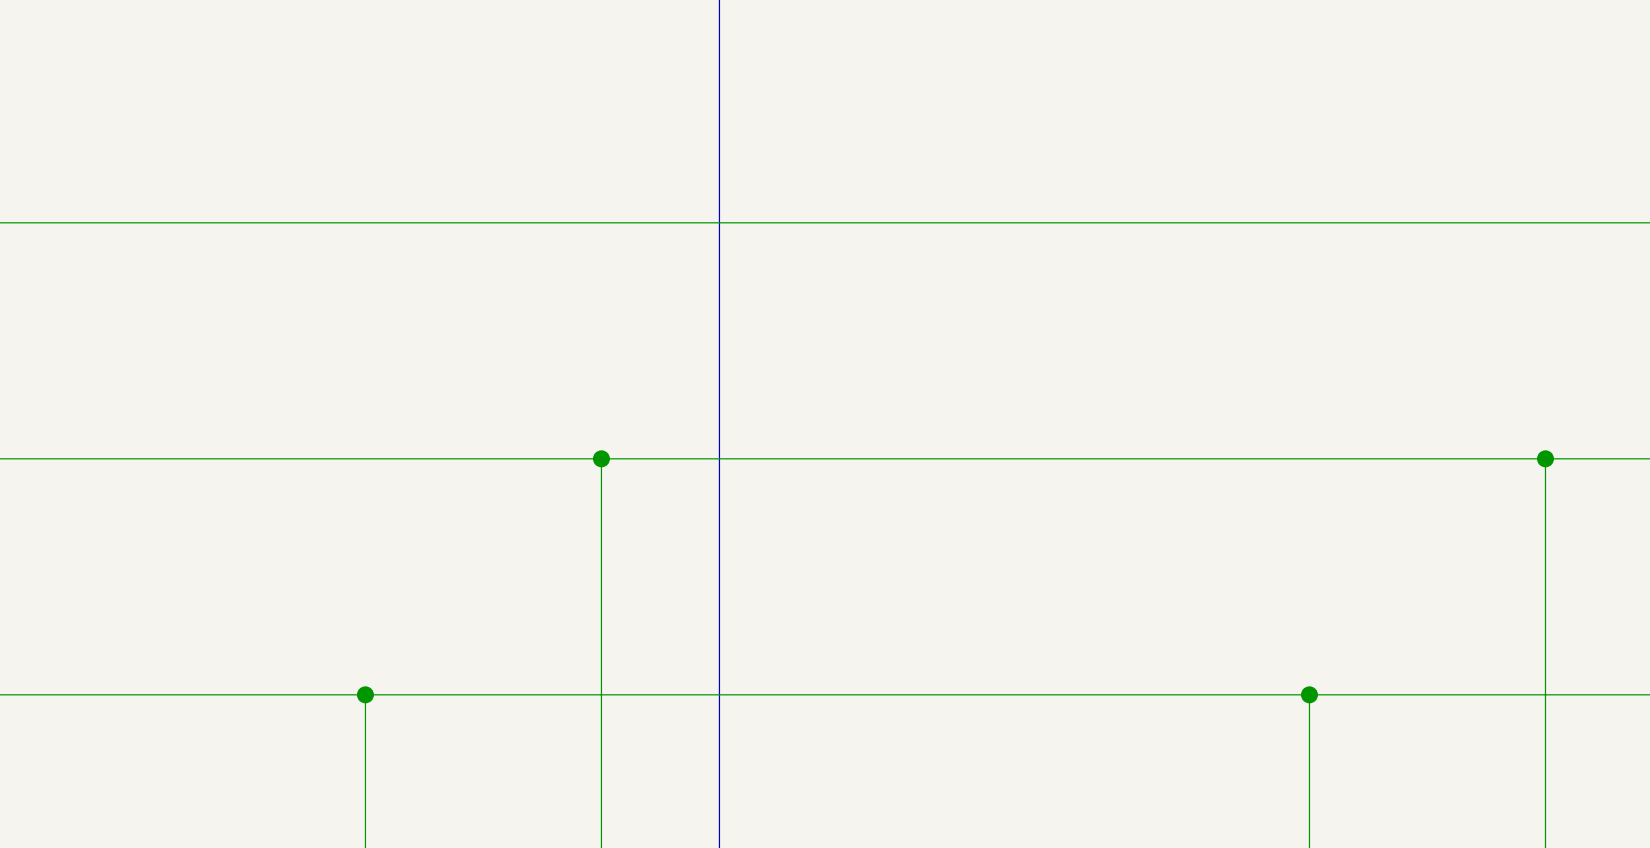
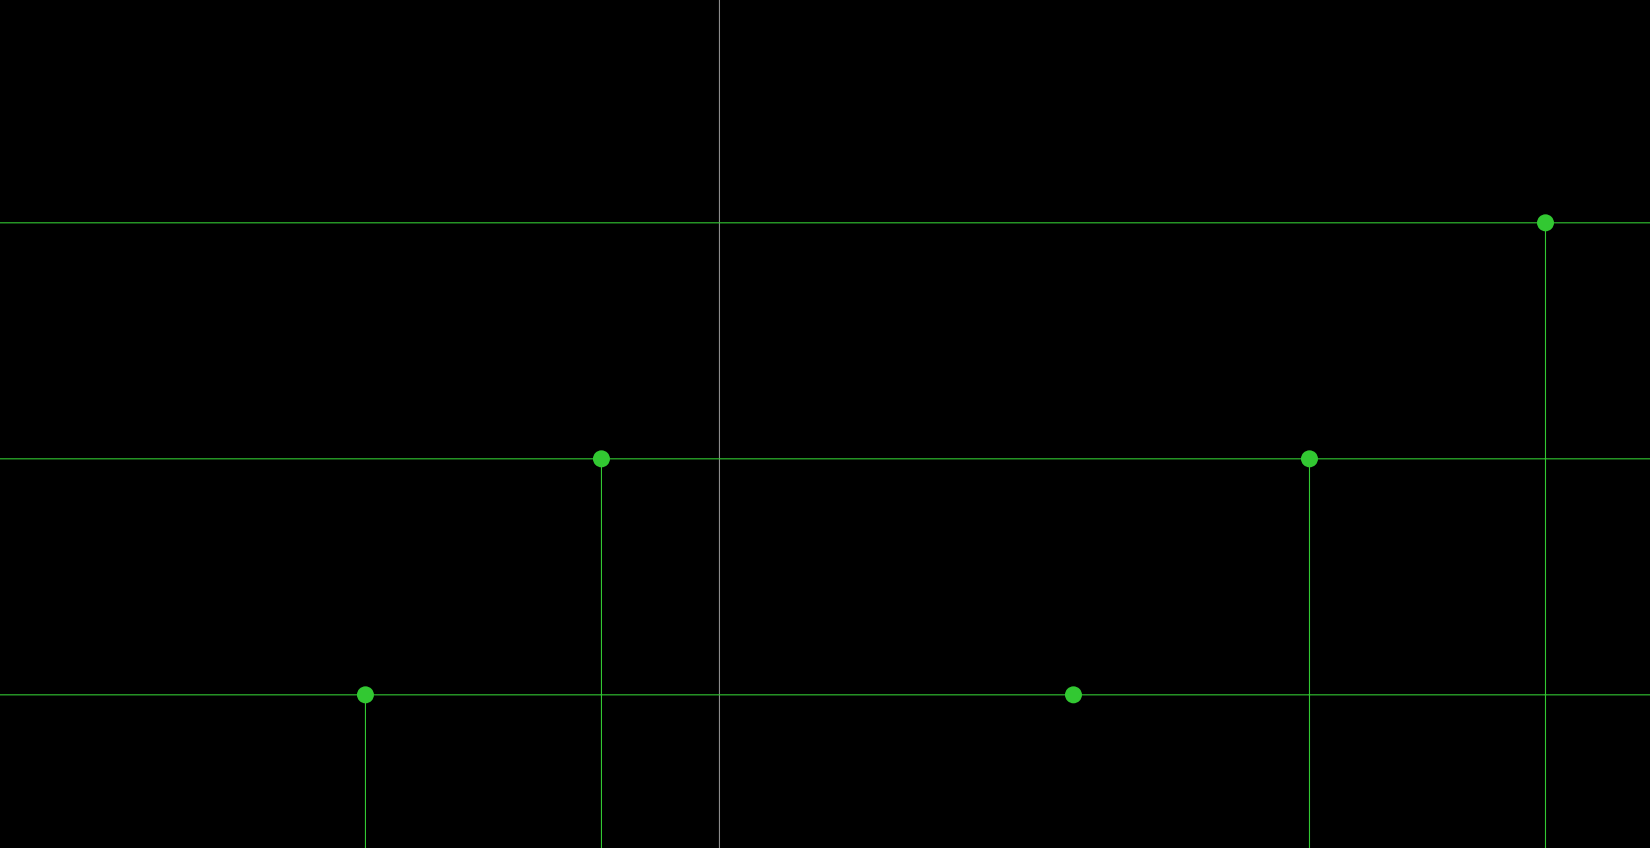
wire: none -> (1545, 222) (1545, 458)
junction: none -> (1545, 222)
wire: none -> (1309, 458) (1309, 694)
junction: none -> (1309, 458)
junction: (1545, 458) -> none
junction: none -> (1073, 694)
junction: (1309, 694) -> none

